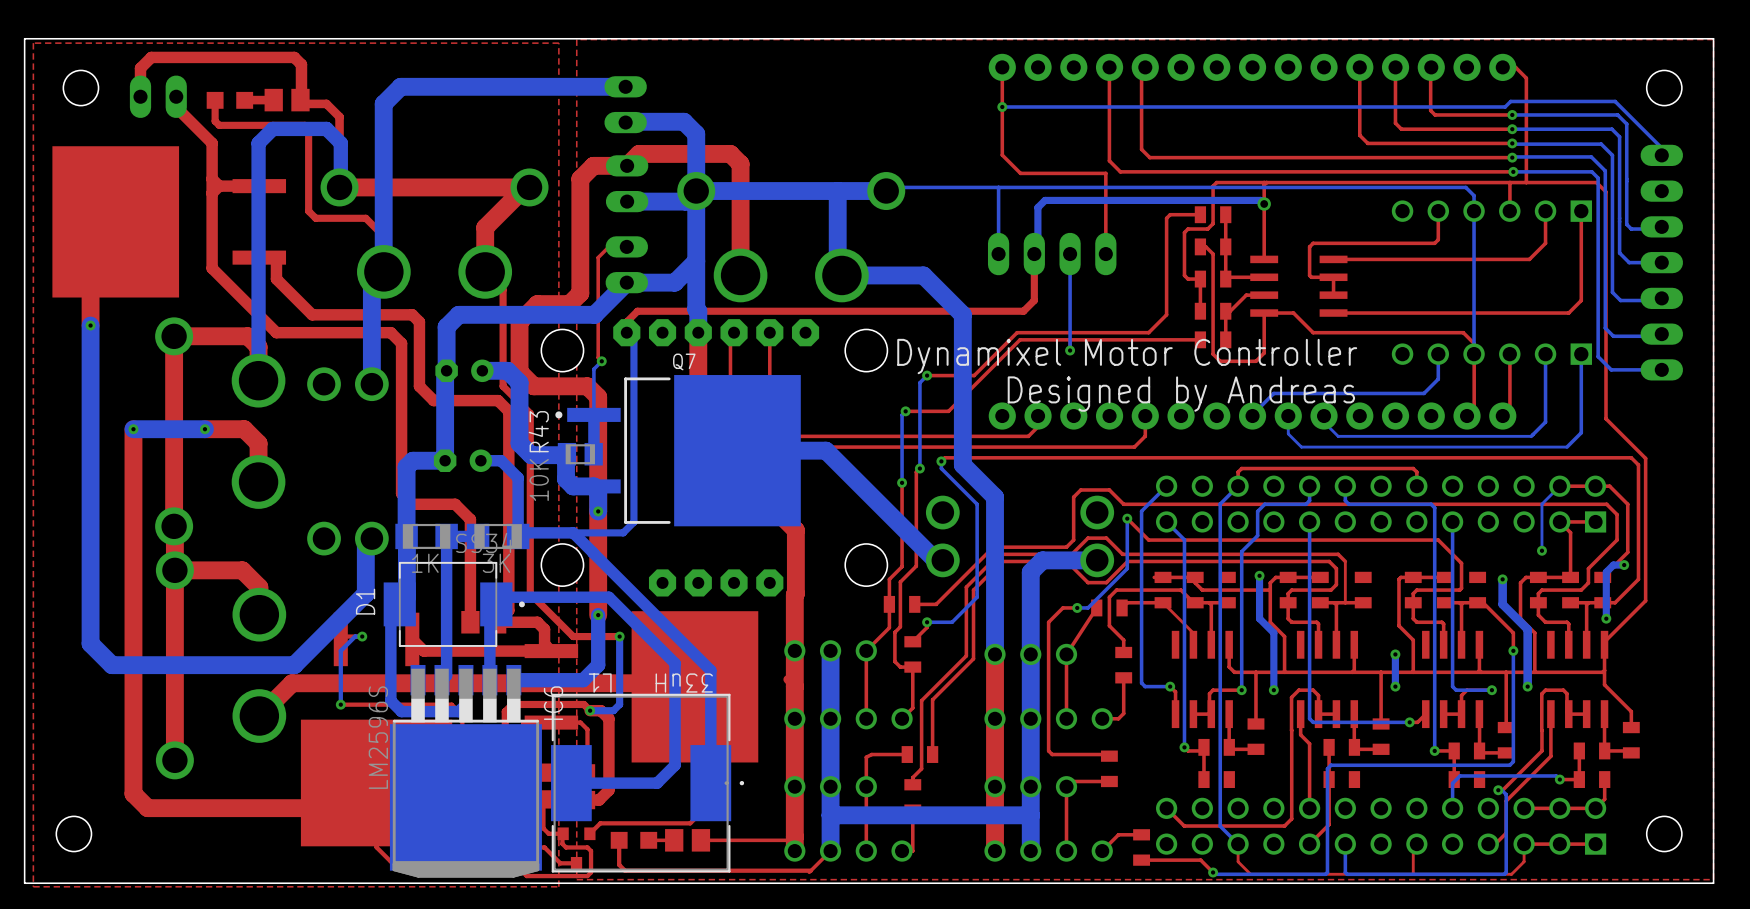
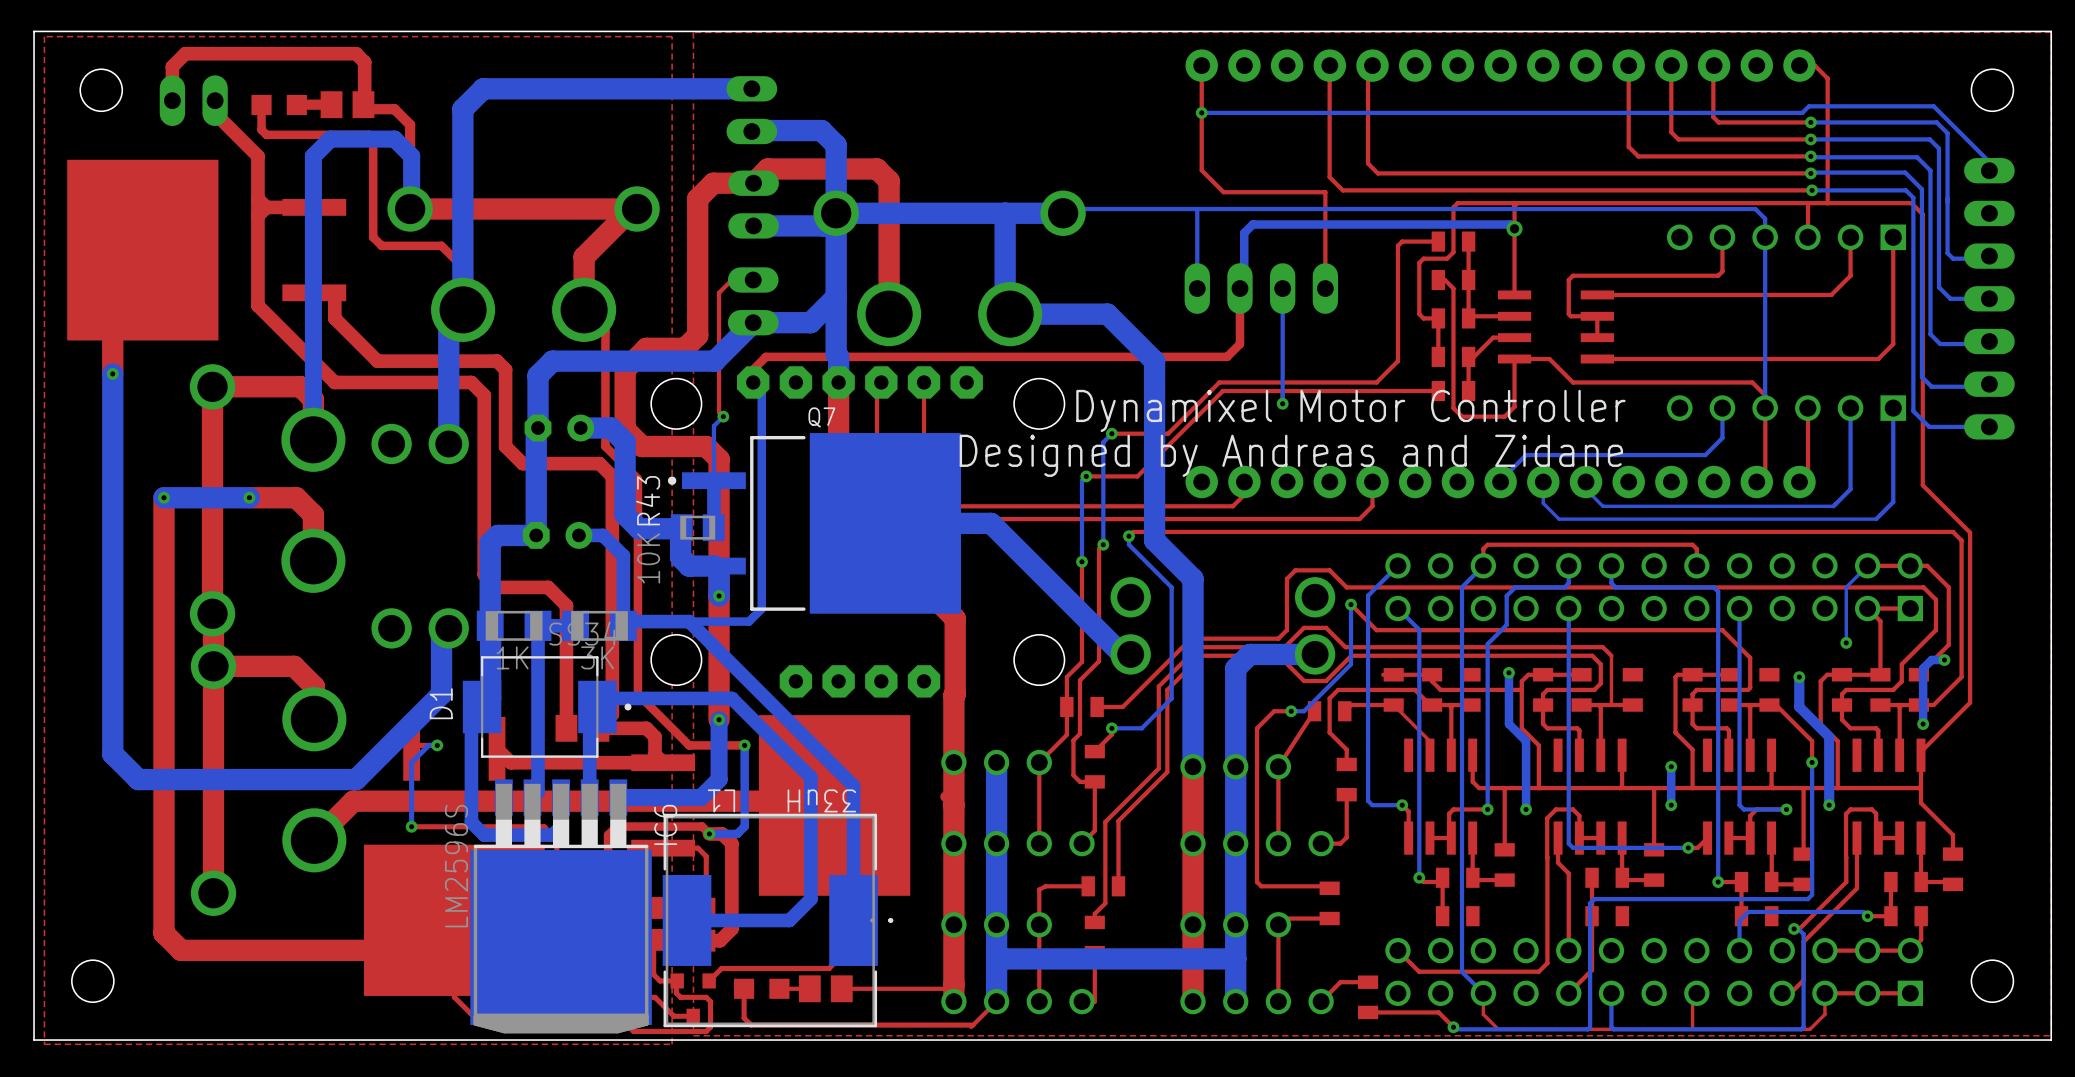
text: Designed by Andreas (1181, 394) -> Designed by Andreas and Zidane (1291, 455)

